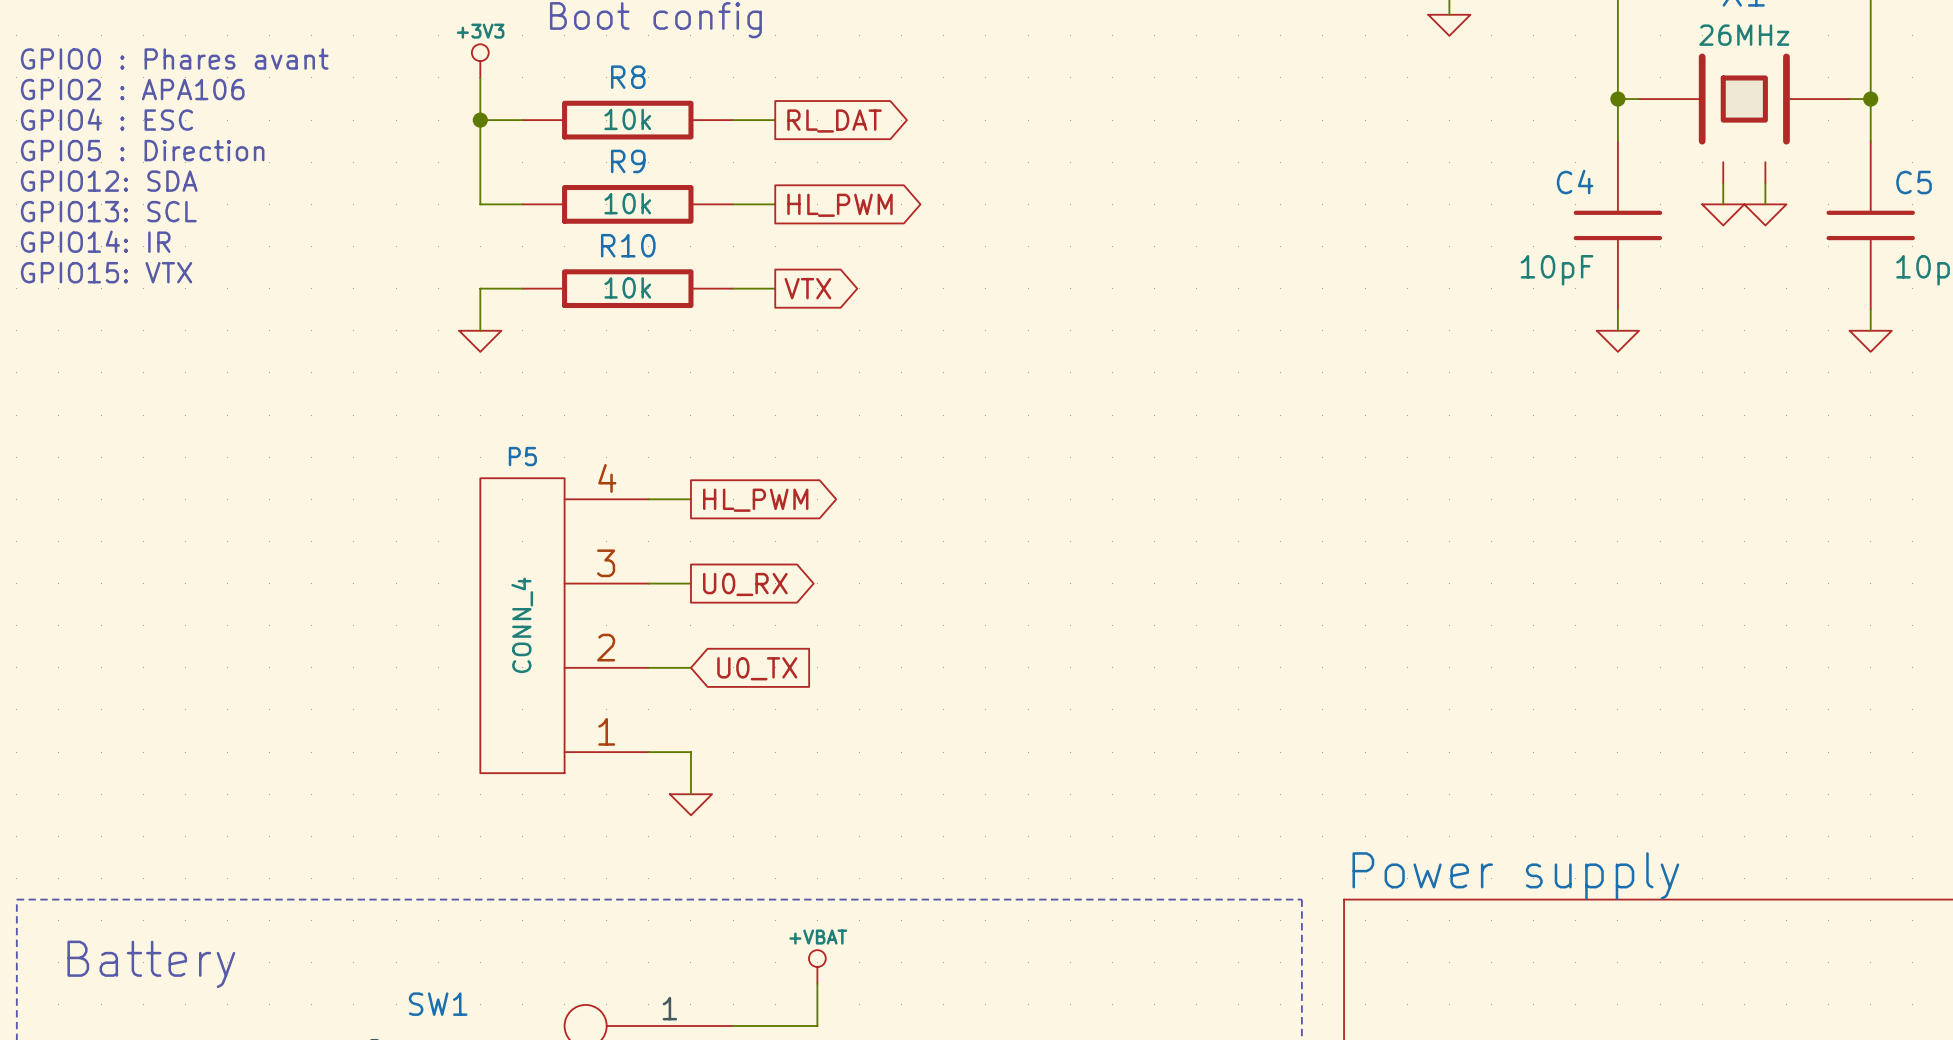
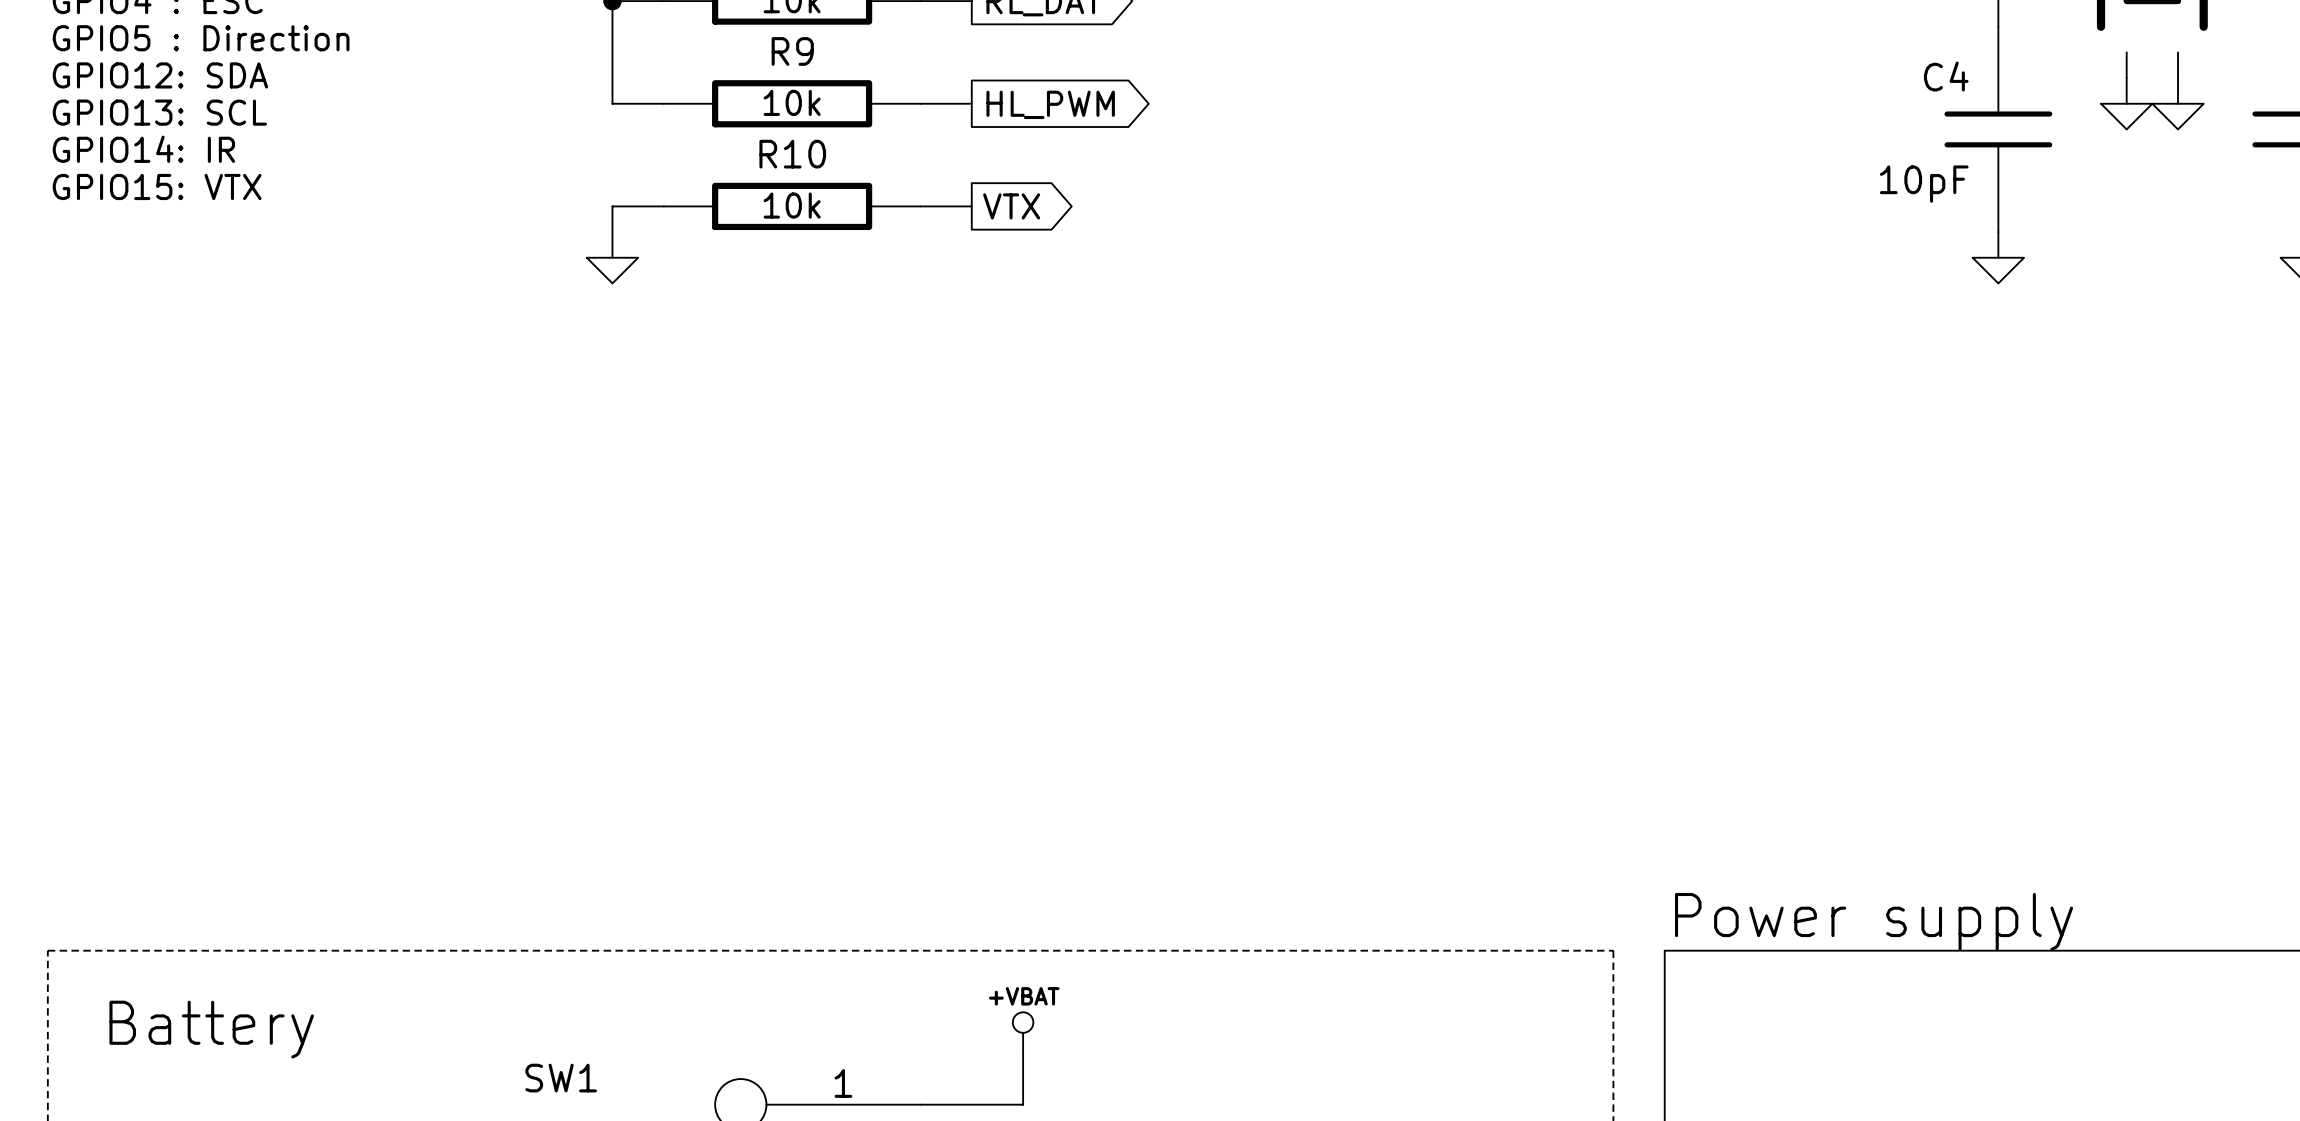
wire: (648, 499) (690, 499) -> none
global label: HL_PWM (755, 500) -> none
wire: (648, 583) (690, 583) -> none
global label: U0_RX (745, 584) -> none
P5: CONN_4 (564, 625) -> none
wire: (648, 667) (690, 667) -> none
global label: U0_TX (757, 668) -> none
wire: (648, 752) (690, 752) (690, 794) -> none
power symbol: (690, 804) -> none

